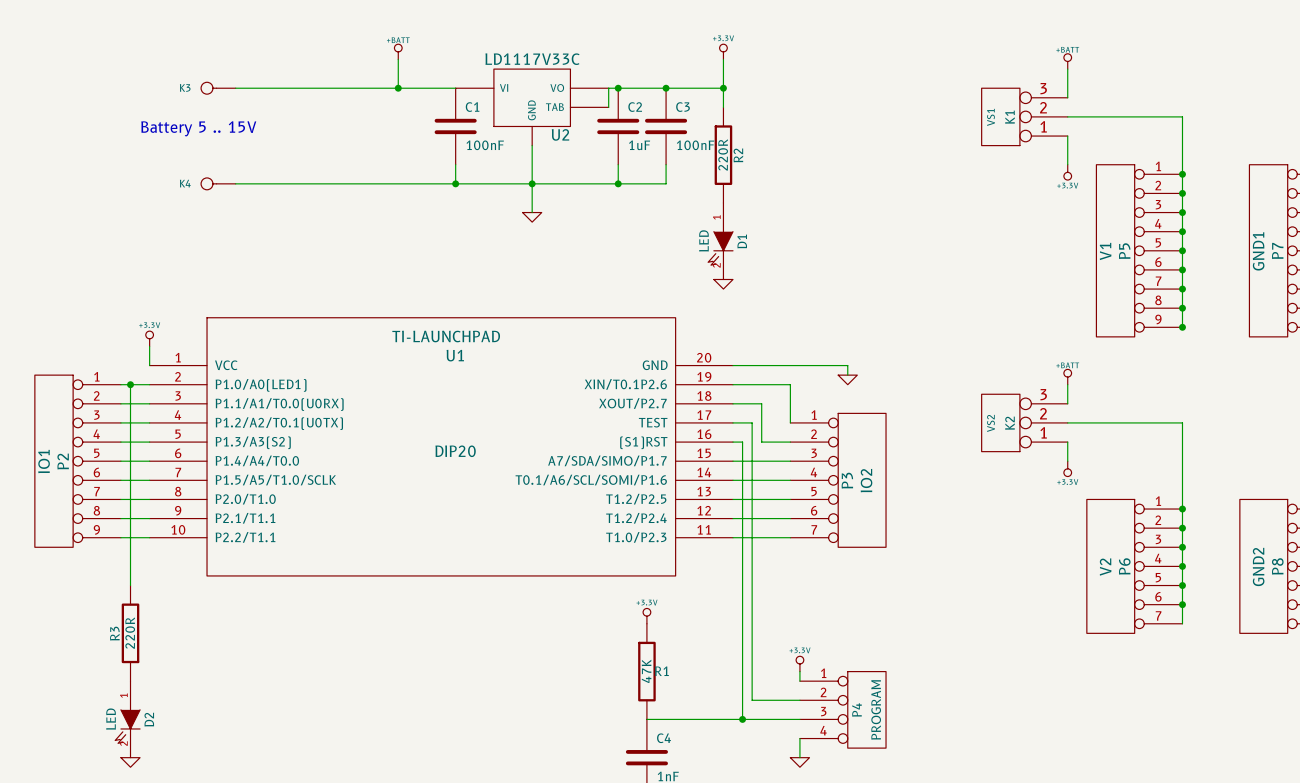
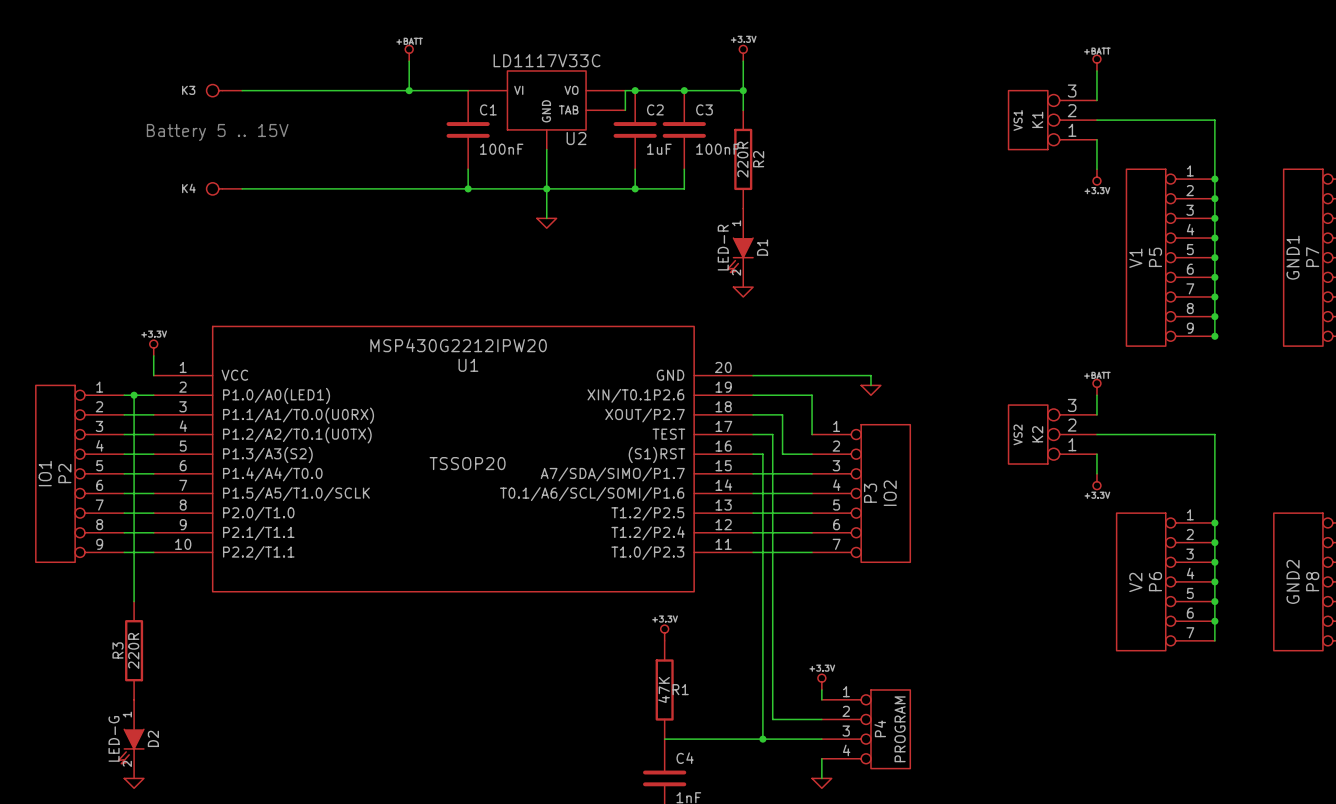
D1 value: LED (703, 240) -> LED-R (723, 247)
U1 value: TI-LAUNCHPAD (446, 336) -> MSP430G2212IPW20 (458, 345)
U1 text: DIP20 (455, 451) -> TSSOP20 (467, 463)
D2 value: LED (111, 719) -> LED-G (114, 738)

